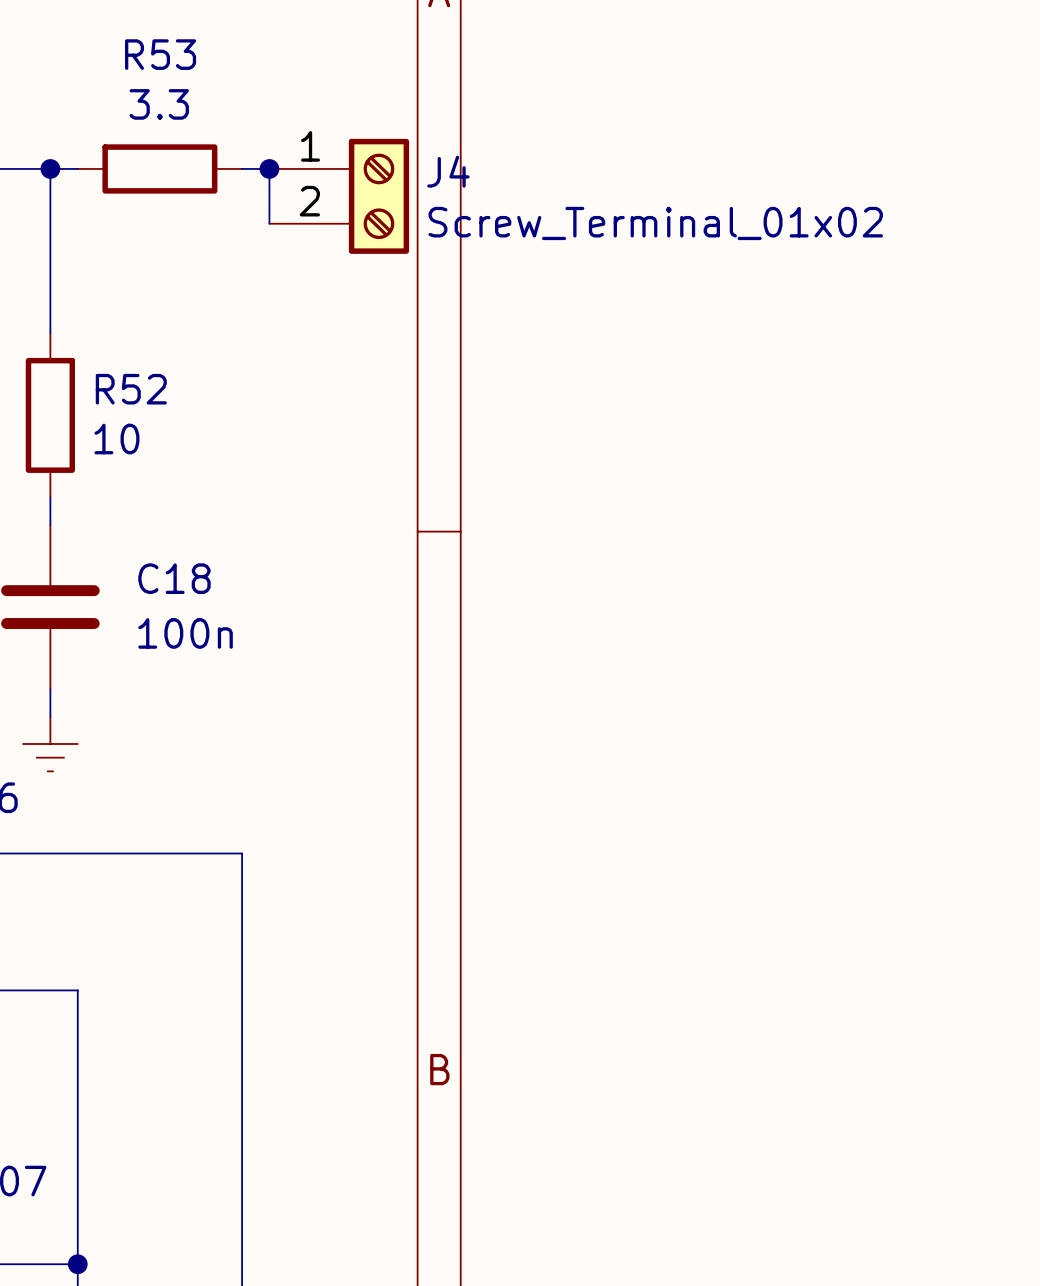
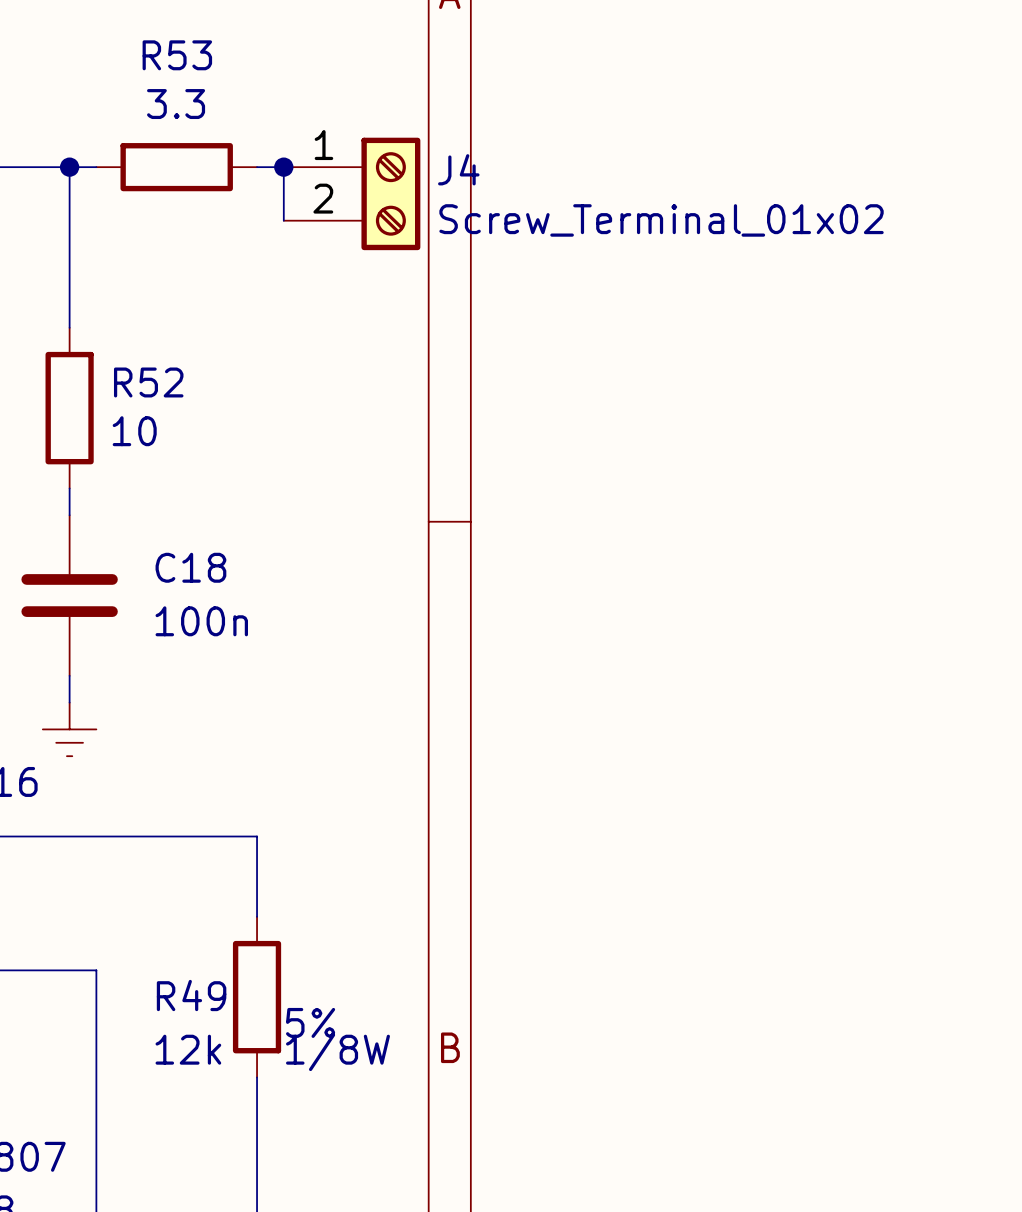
wire: (242, 935) (242, 1099) -> none
R49: none -> 12k (257, 997)

